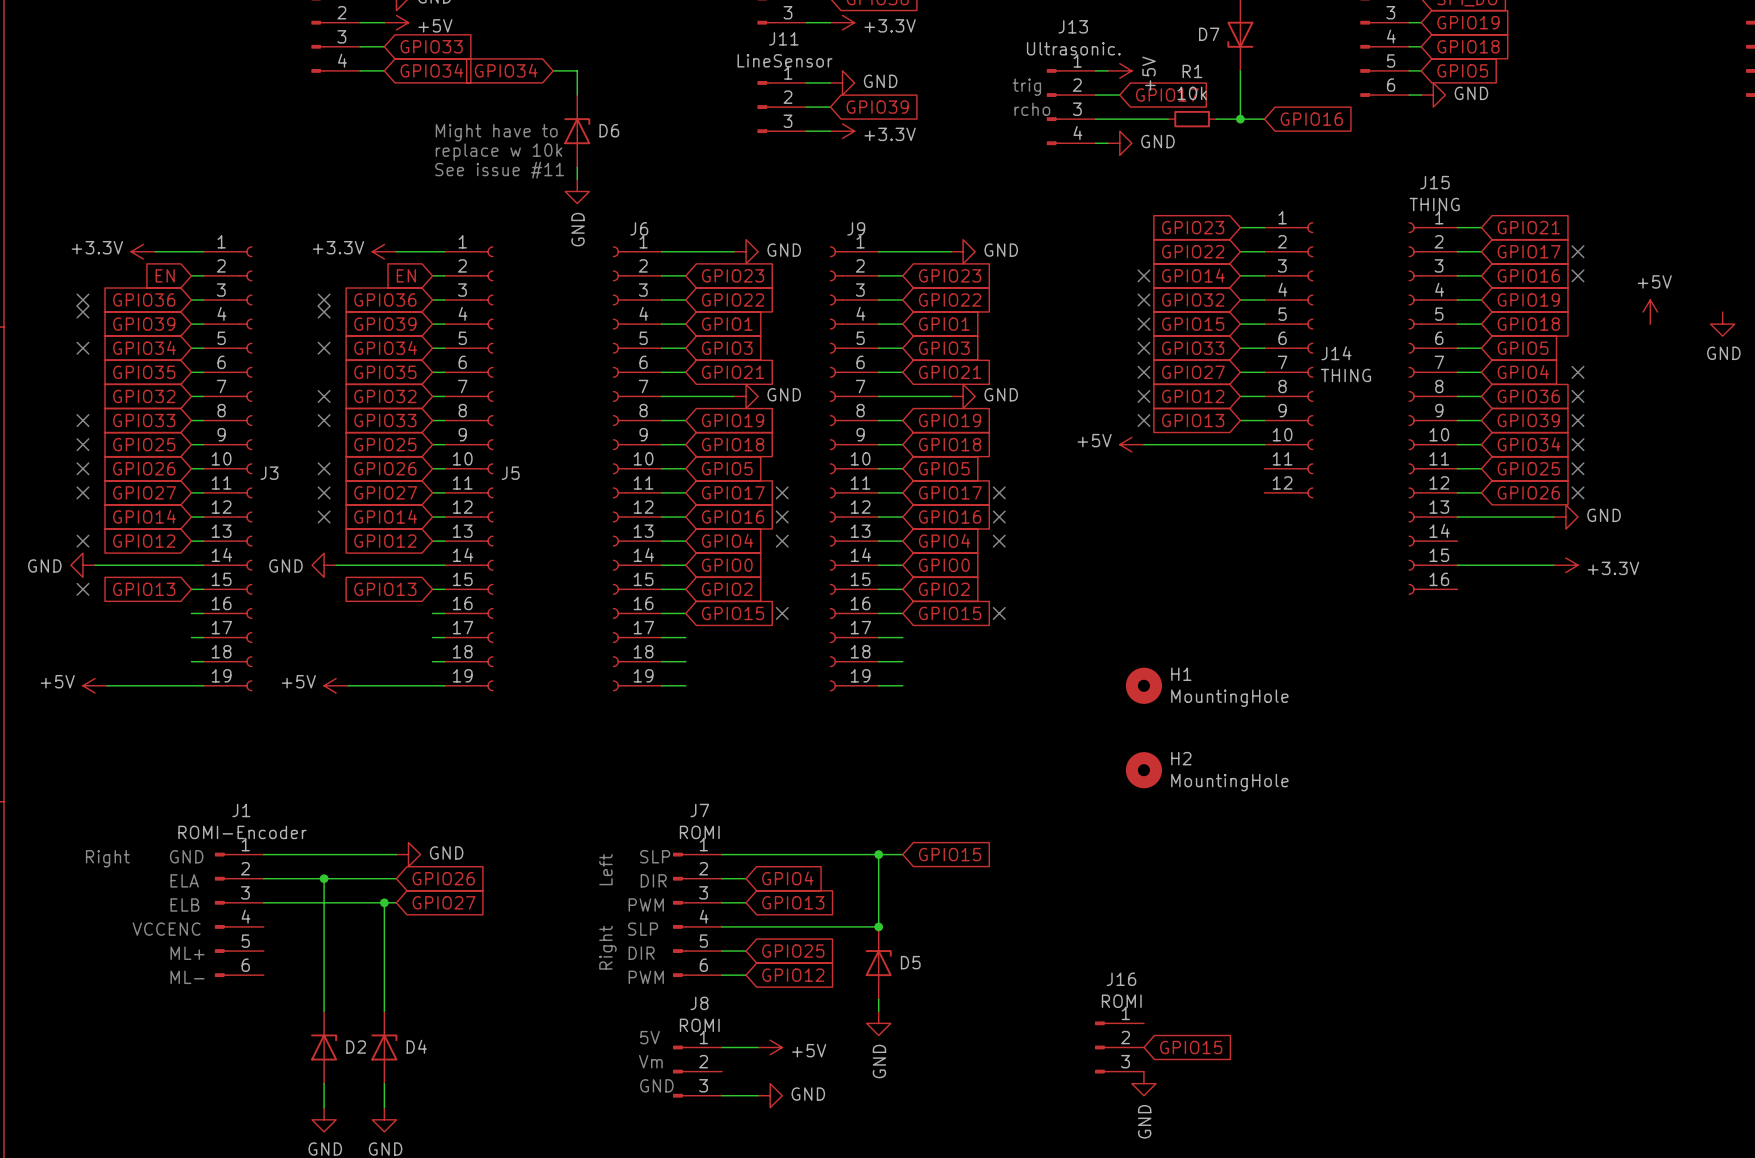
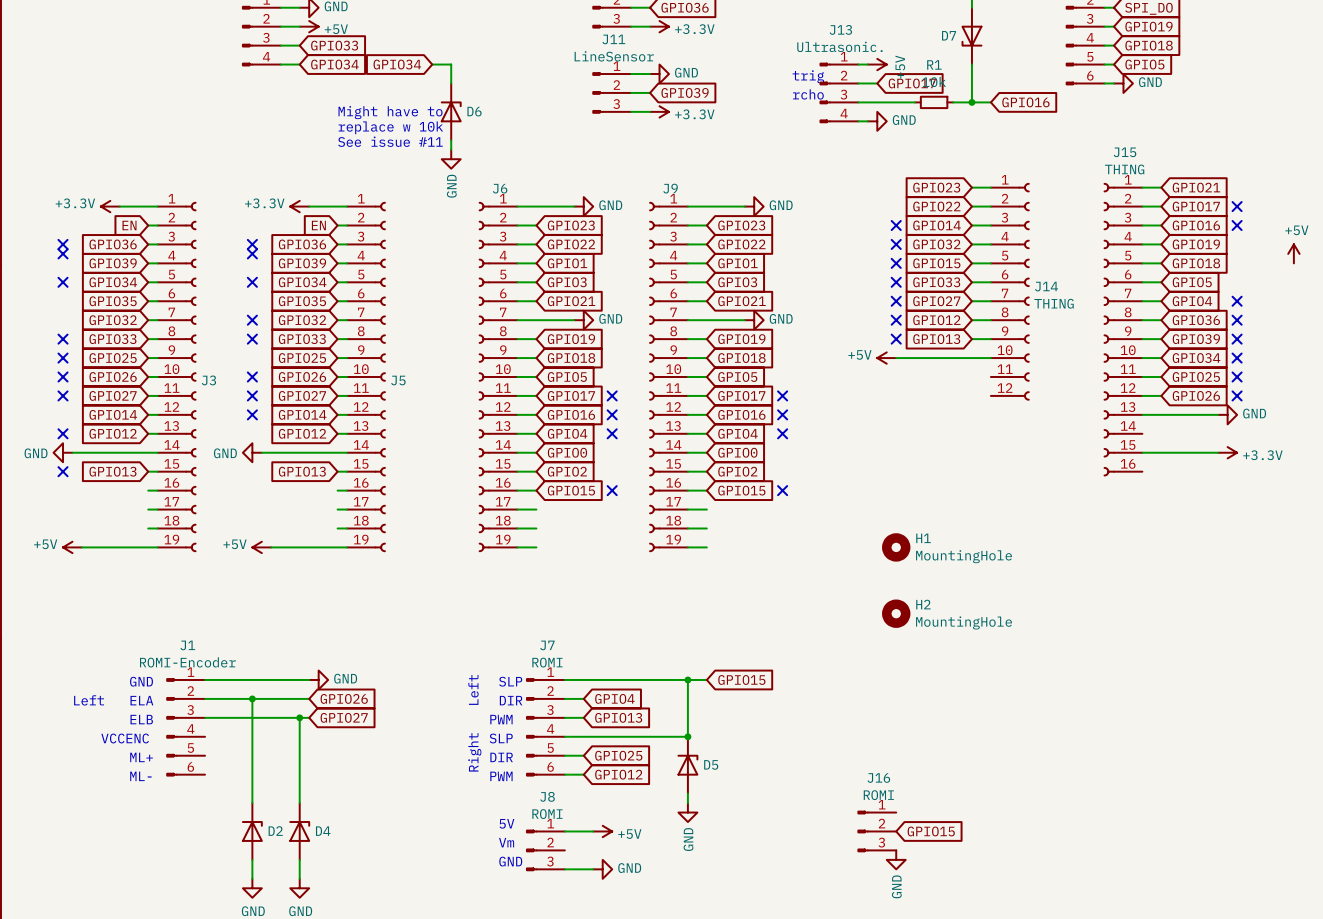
text: Right (107, 858) -> none
text: none -> Left (89, 700)

